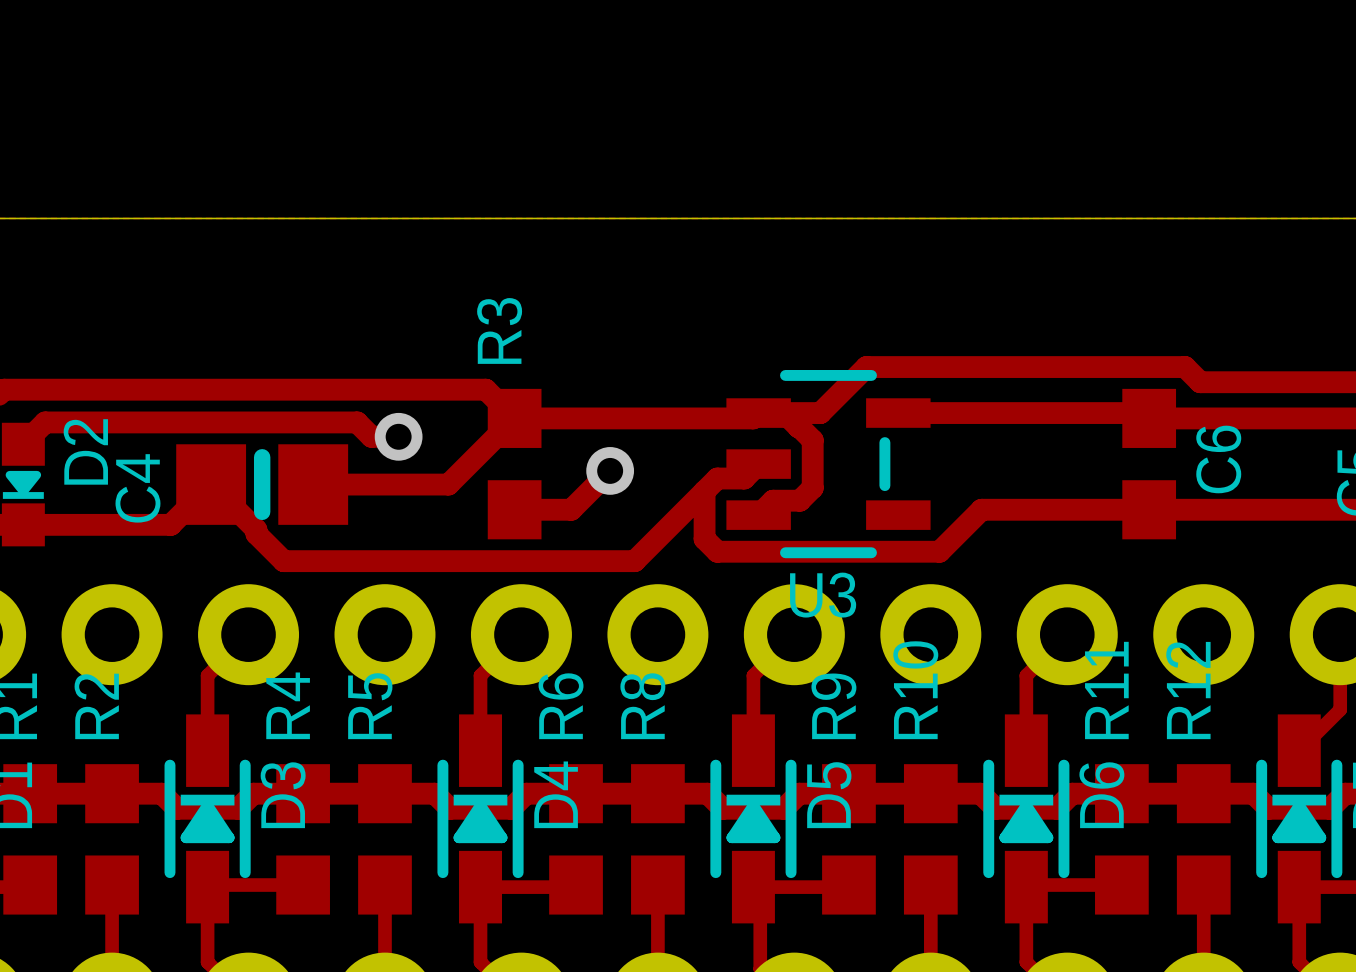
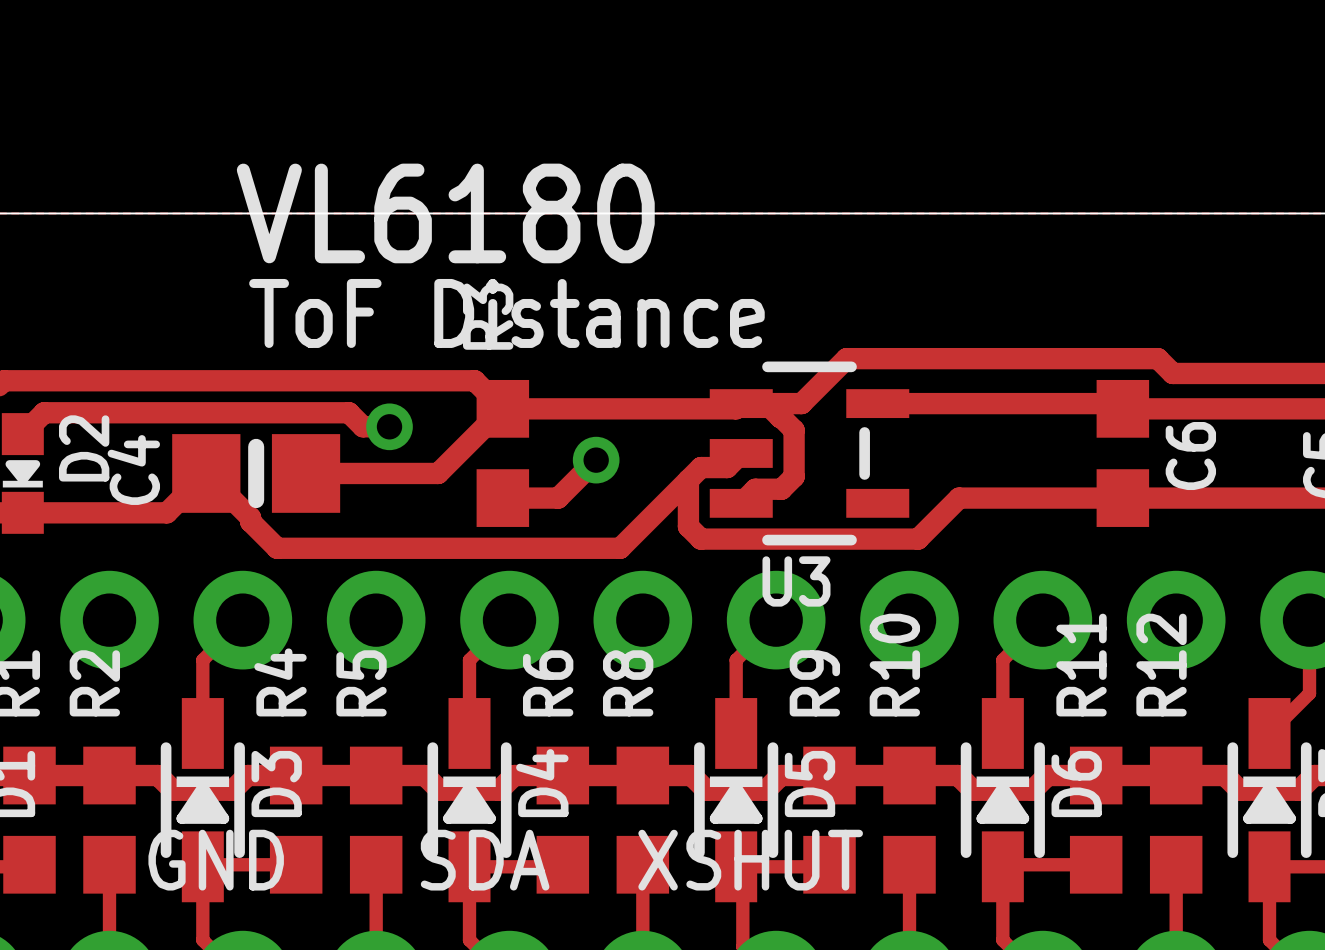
text: none -> VL6180 (445, 213)
text: none -> ToF Distance (506, 313)
text: none -> GND (216, 860)
text: none -> SDA (485, 860)
text: none -> XSHUT (750, 860)

